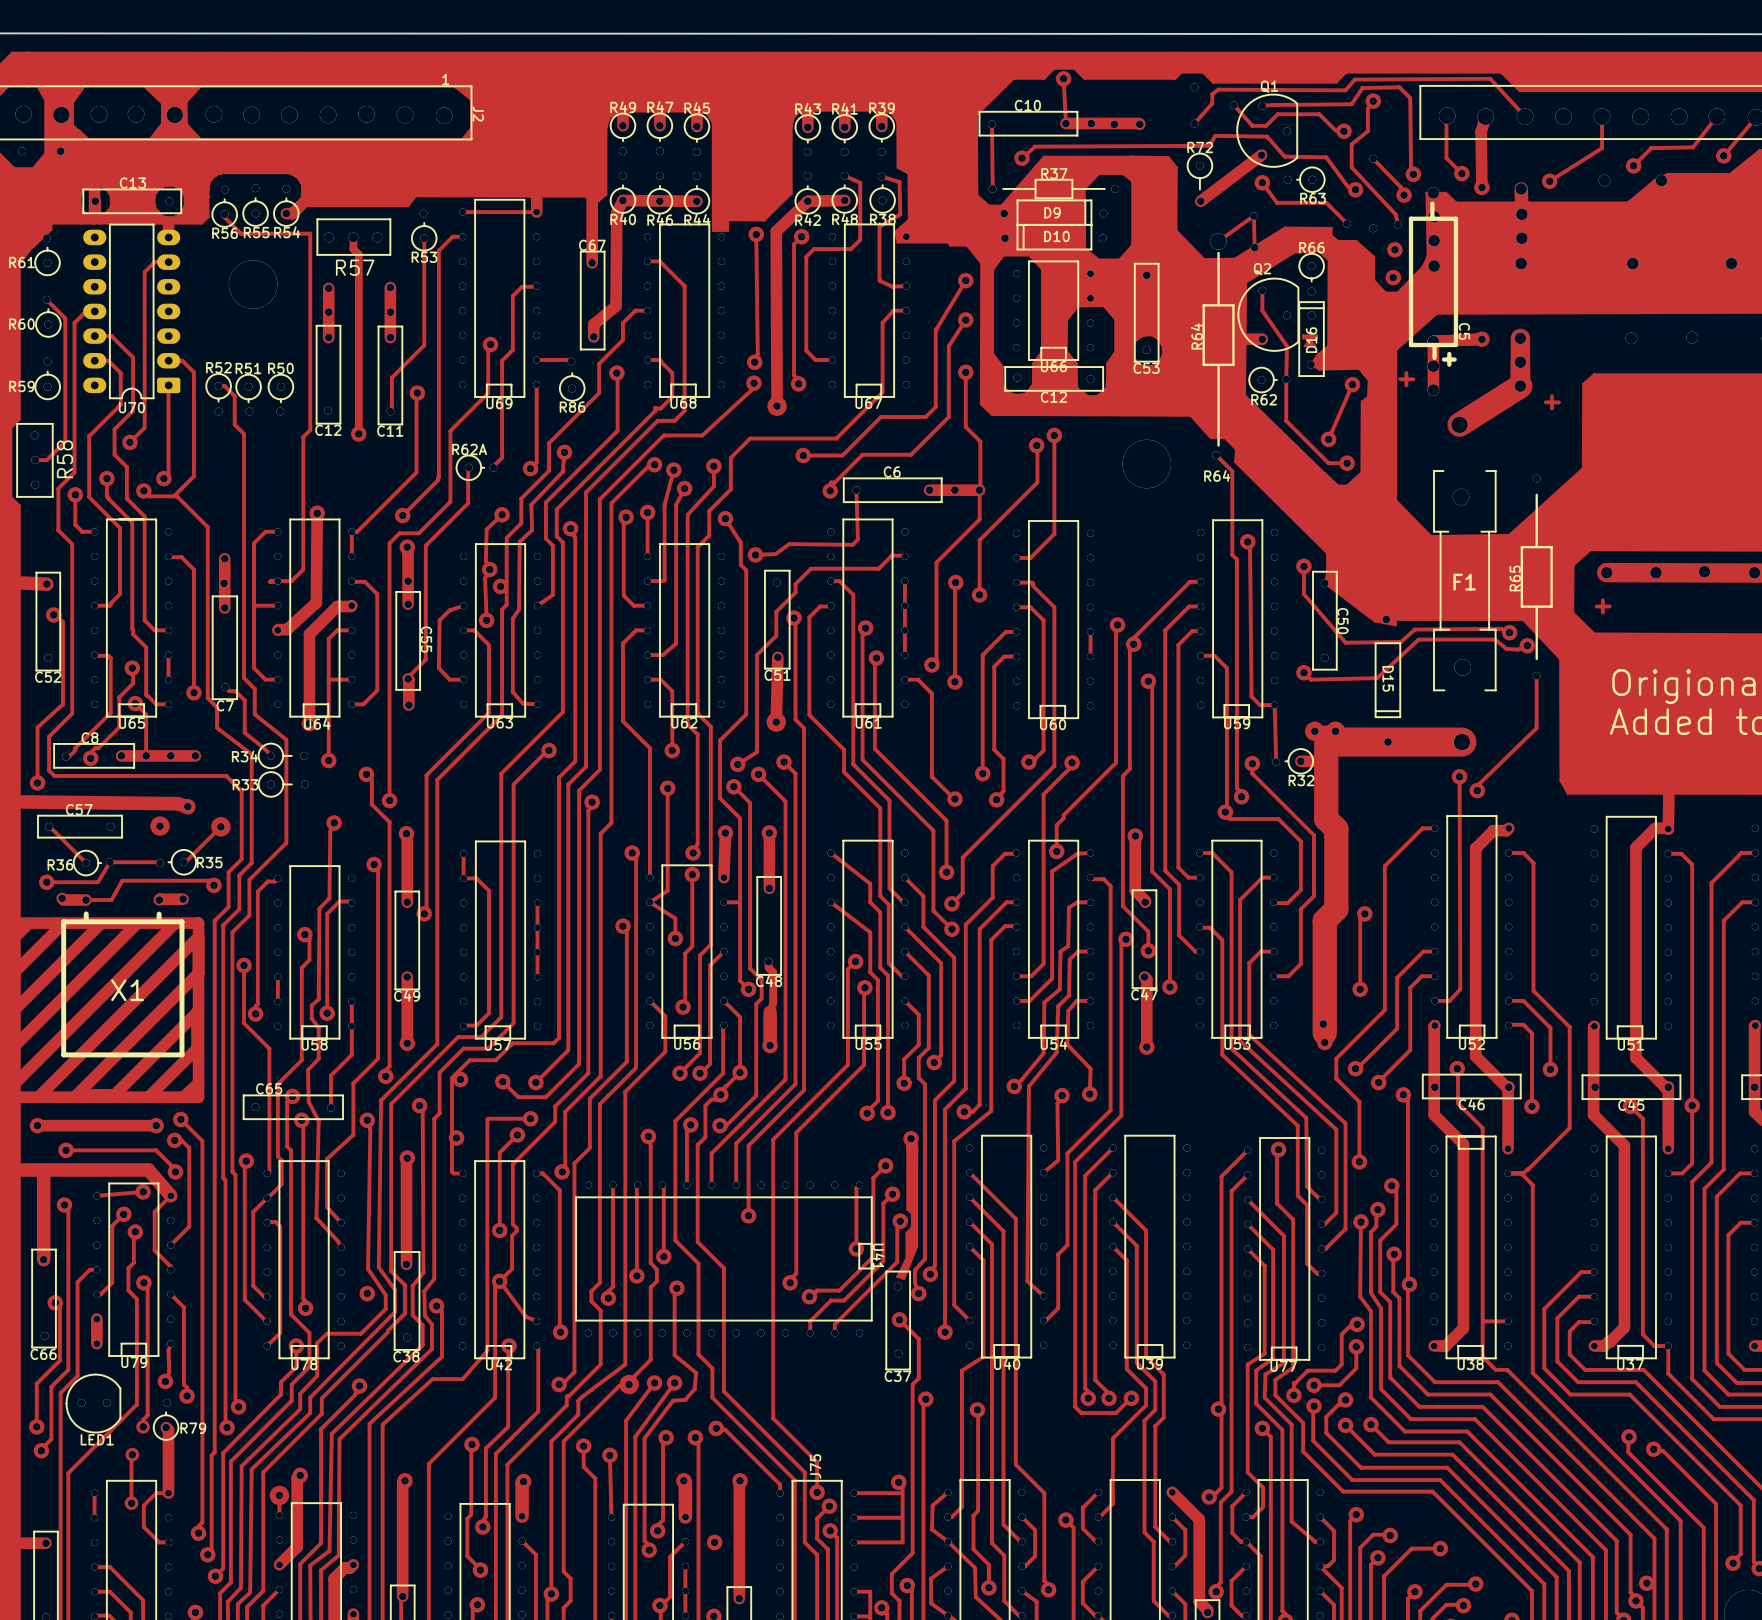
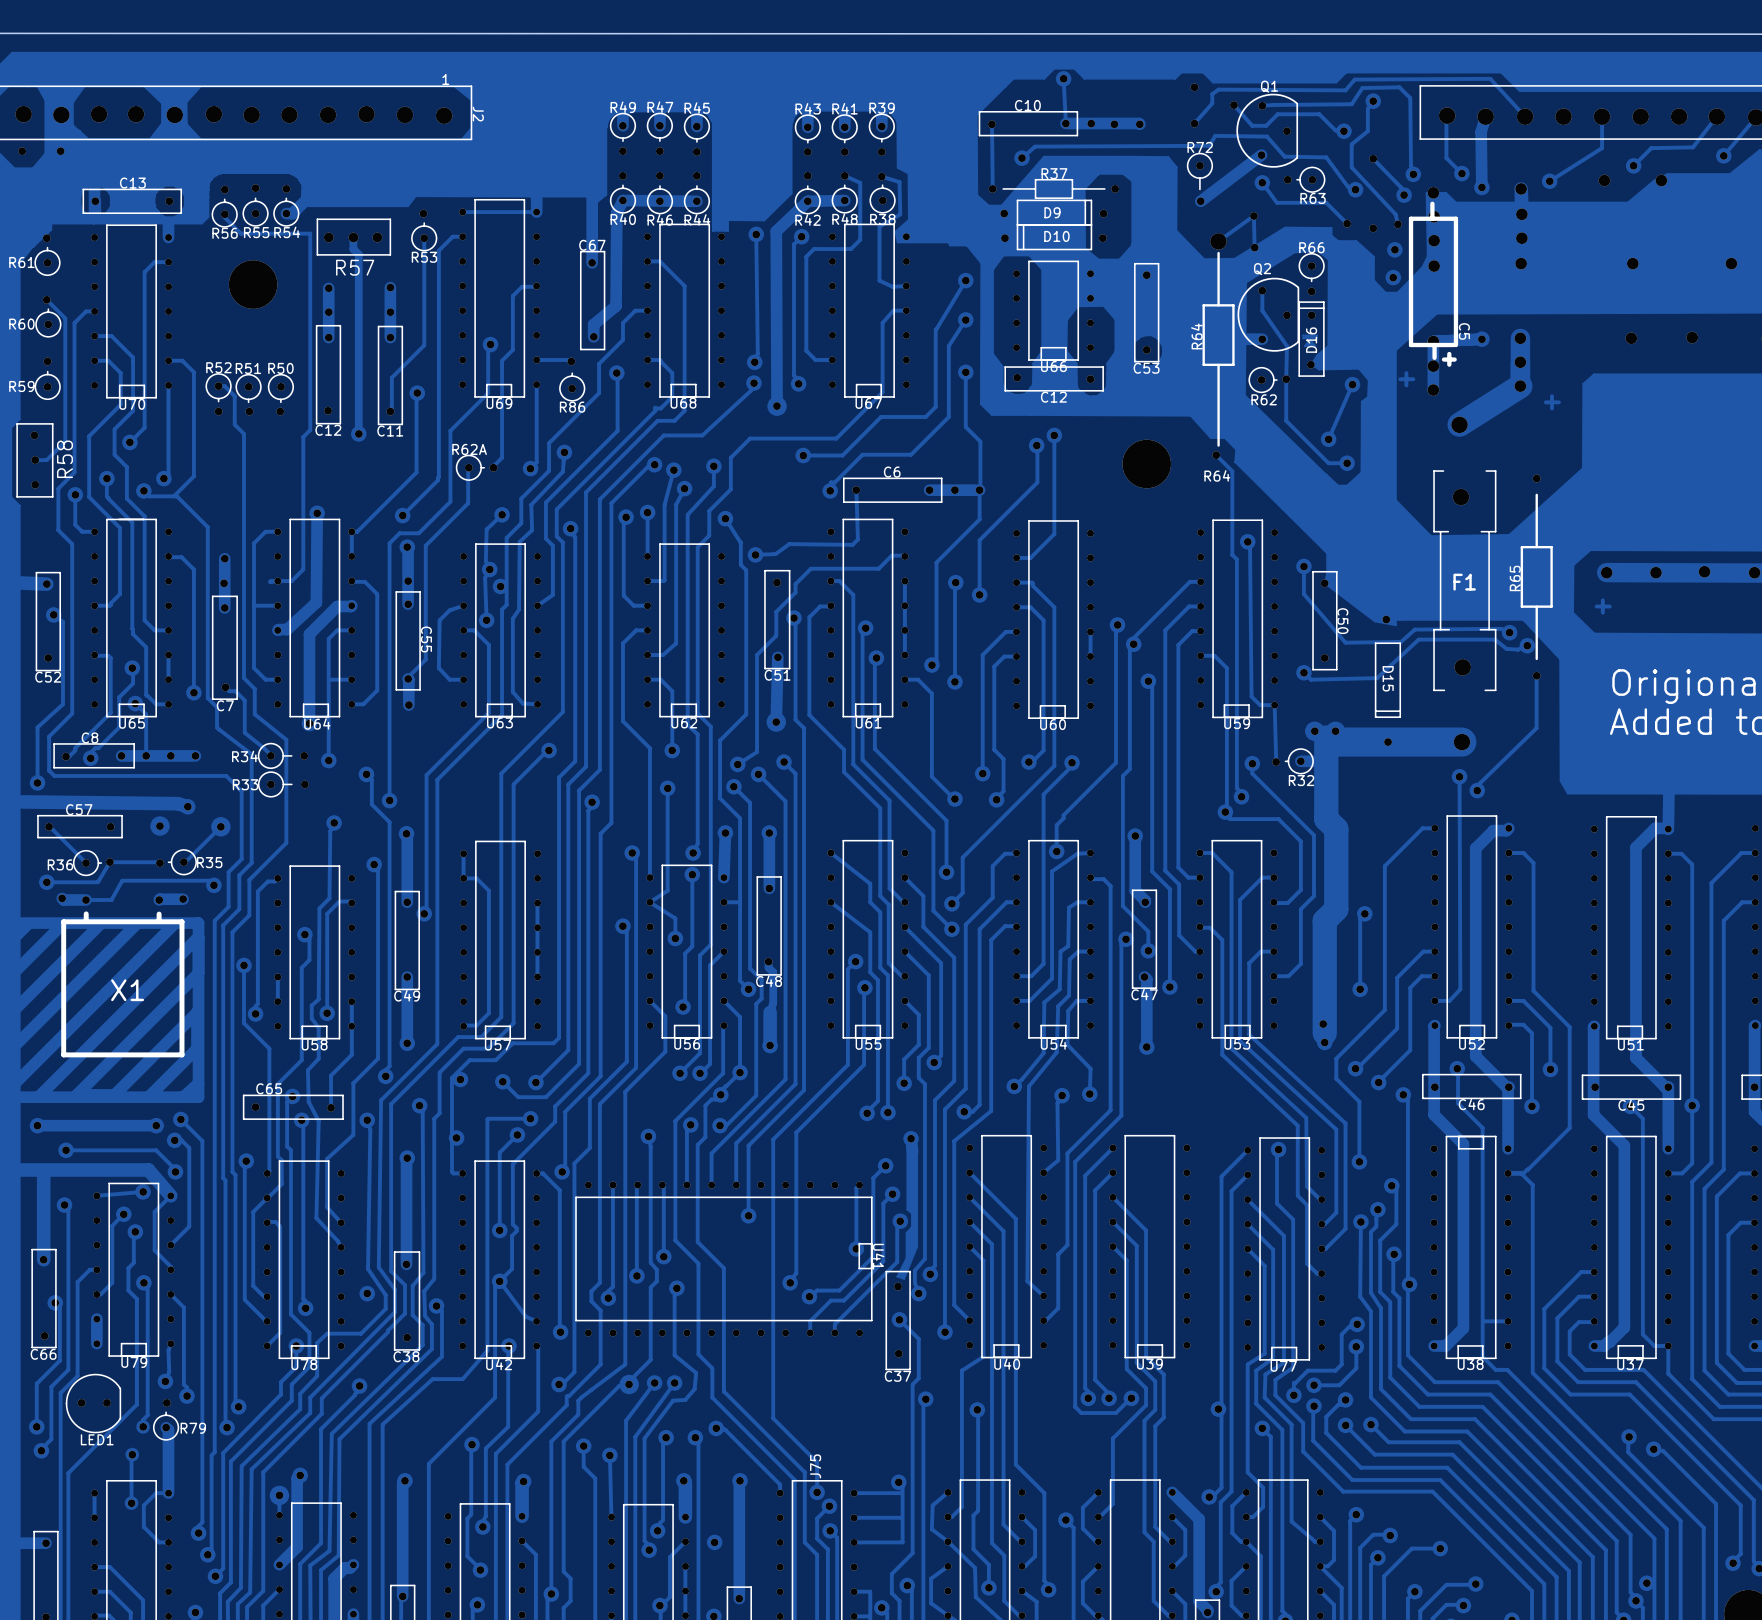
line: none -> (106, 225) (106, 397) (156, 397) (156, 225) (106, 225)
via: none -> (94, 237)
via: none -> (168, 237)
via: none -> (94, 262)
via: none -> (168, 262)
via: none -> (94, 286)
via: none -> (168, 286)
via: none -> (94, 311)
U70: (131, 311) -> none
via: none -> (168, 311)
via: none -> (94, 336)
via: none -> (168, 336)
via: none -> (94, 360)
via: none -> (168, 360)
via: none -> (94, 385)
via: none -> (168, 385)
line: none -> (119, 397) (119, 385) (144, 385) (144, 397)
text: none -> U70 (132, 404)

